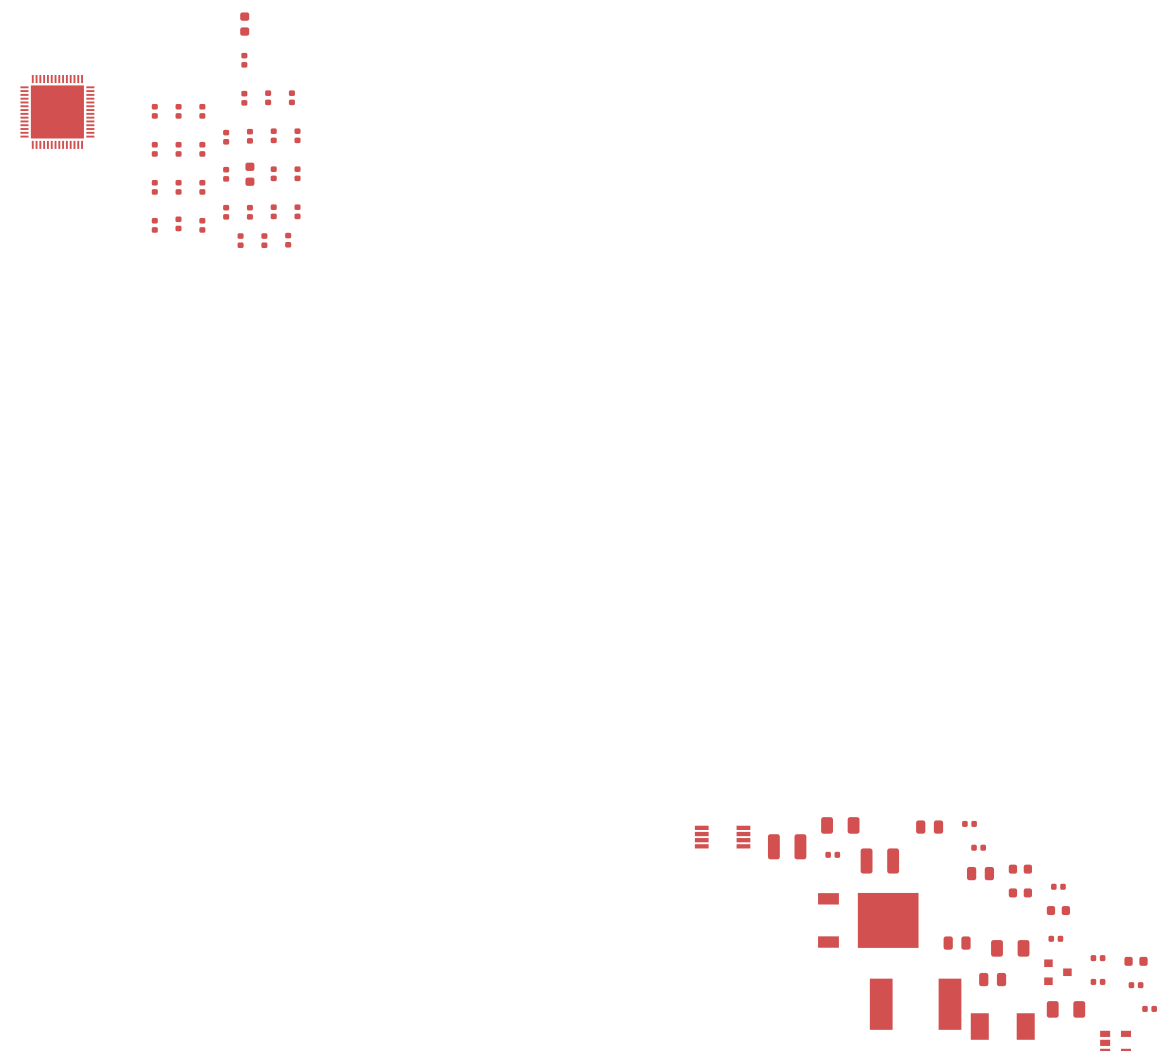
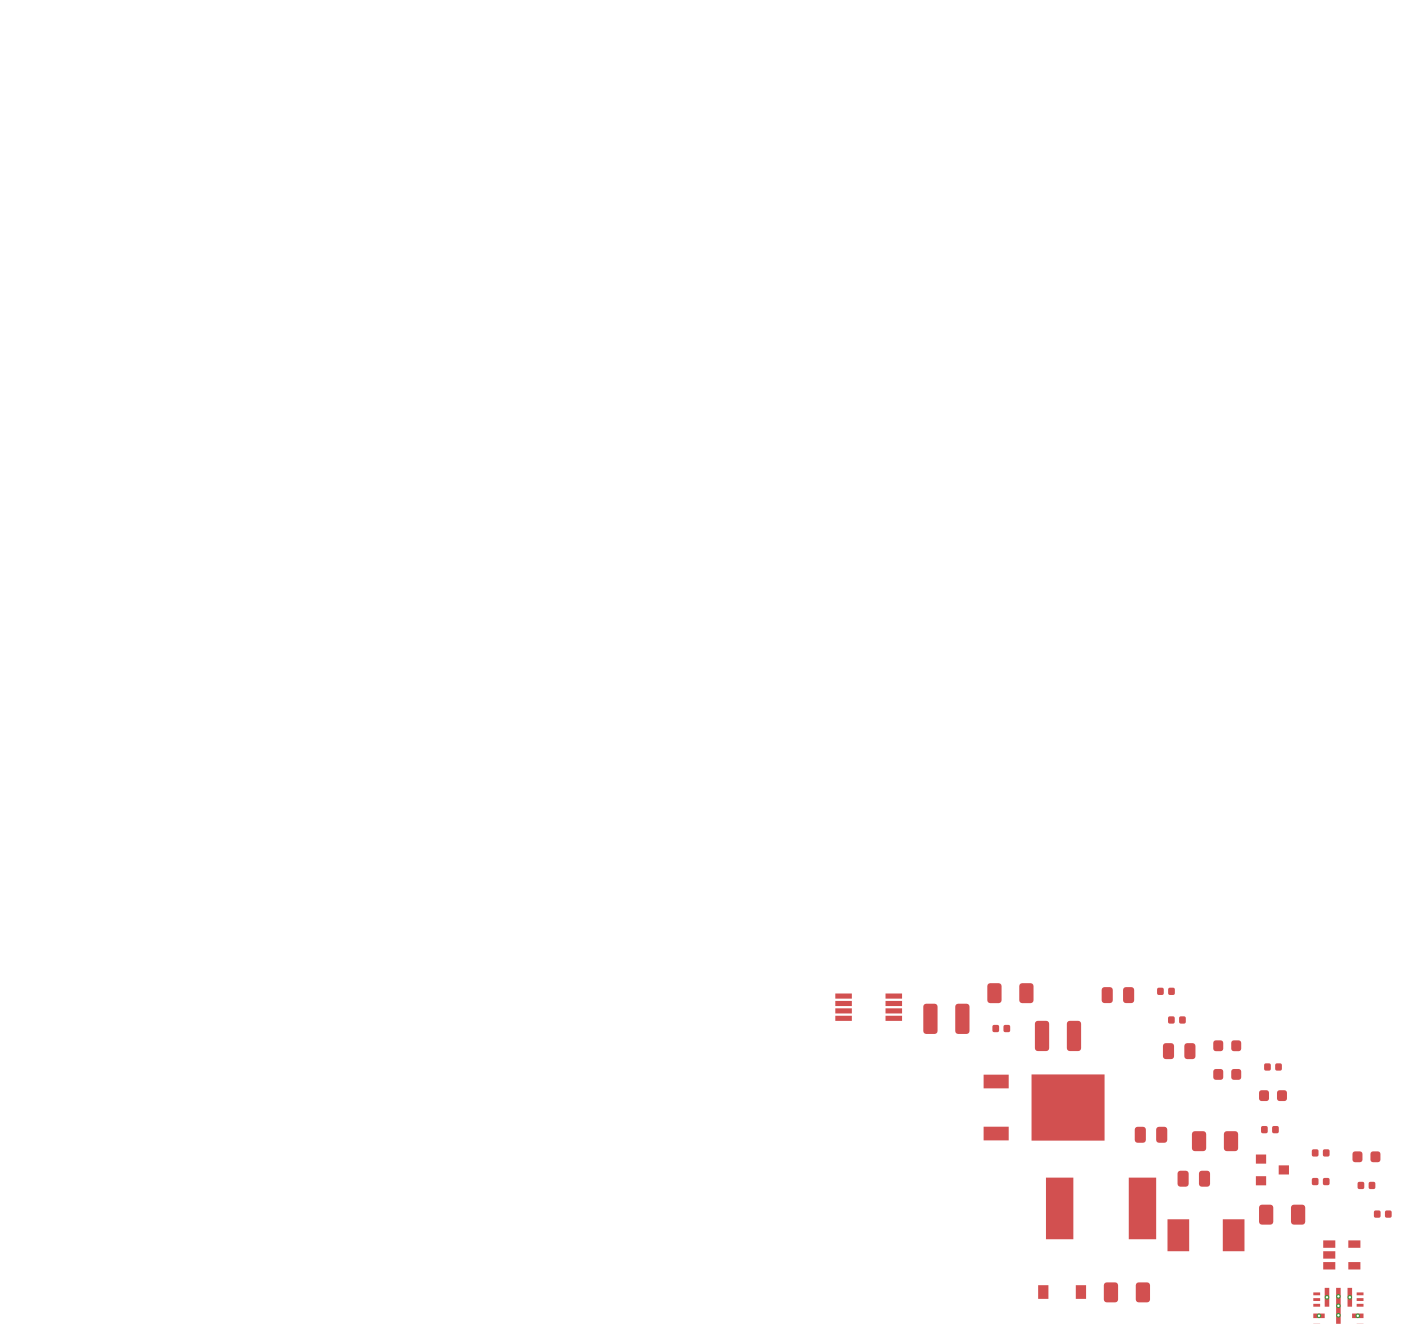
part: (244, 24) -> none
part: (244, 60) -> none
part: (268, 97) -> none
part: (291, 97) -> none
part: (244, 98) -> none
part: (57, 111) -> none
part: (154, 111) -> none
part: (178, 111) -> none
part: (202, 111) -> none
part: (273, 135) -> none
part: (297, 135) -> none
part: (249, 136) -> none
part: (226, 137) -> none
part: (154, 149) -> none
part: (178, 149) -> none
part: (202, 149) -> none
part: (273, 173) -> none
part: (297, 173) -> none
part: (226, 174) -> none
part: (249, 174) -> none
part: (154, 187) -> none
part: (178, 187) -> none
part: (202, 187) -> none
part: (273, 211) -> none
part: (297, 211) -> none
part: (226, 212) -> none
part: (249, 212) -> none
part: (178, 223) -> none
part: (154, 225) -> none
part: (202, 225) -> none
part: (240, 240) -> none
part: (264, 240) -> none
part: (288, 240) -> none

